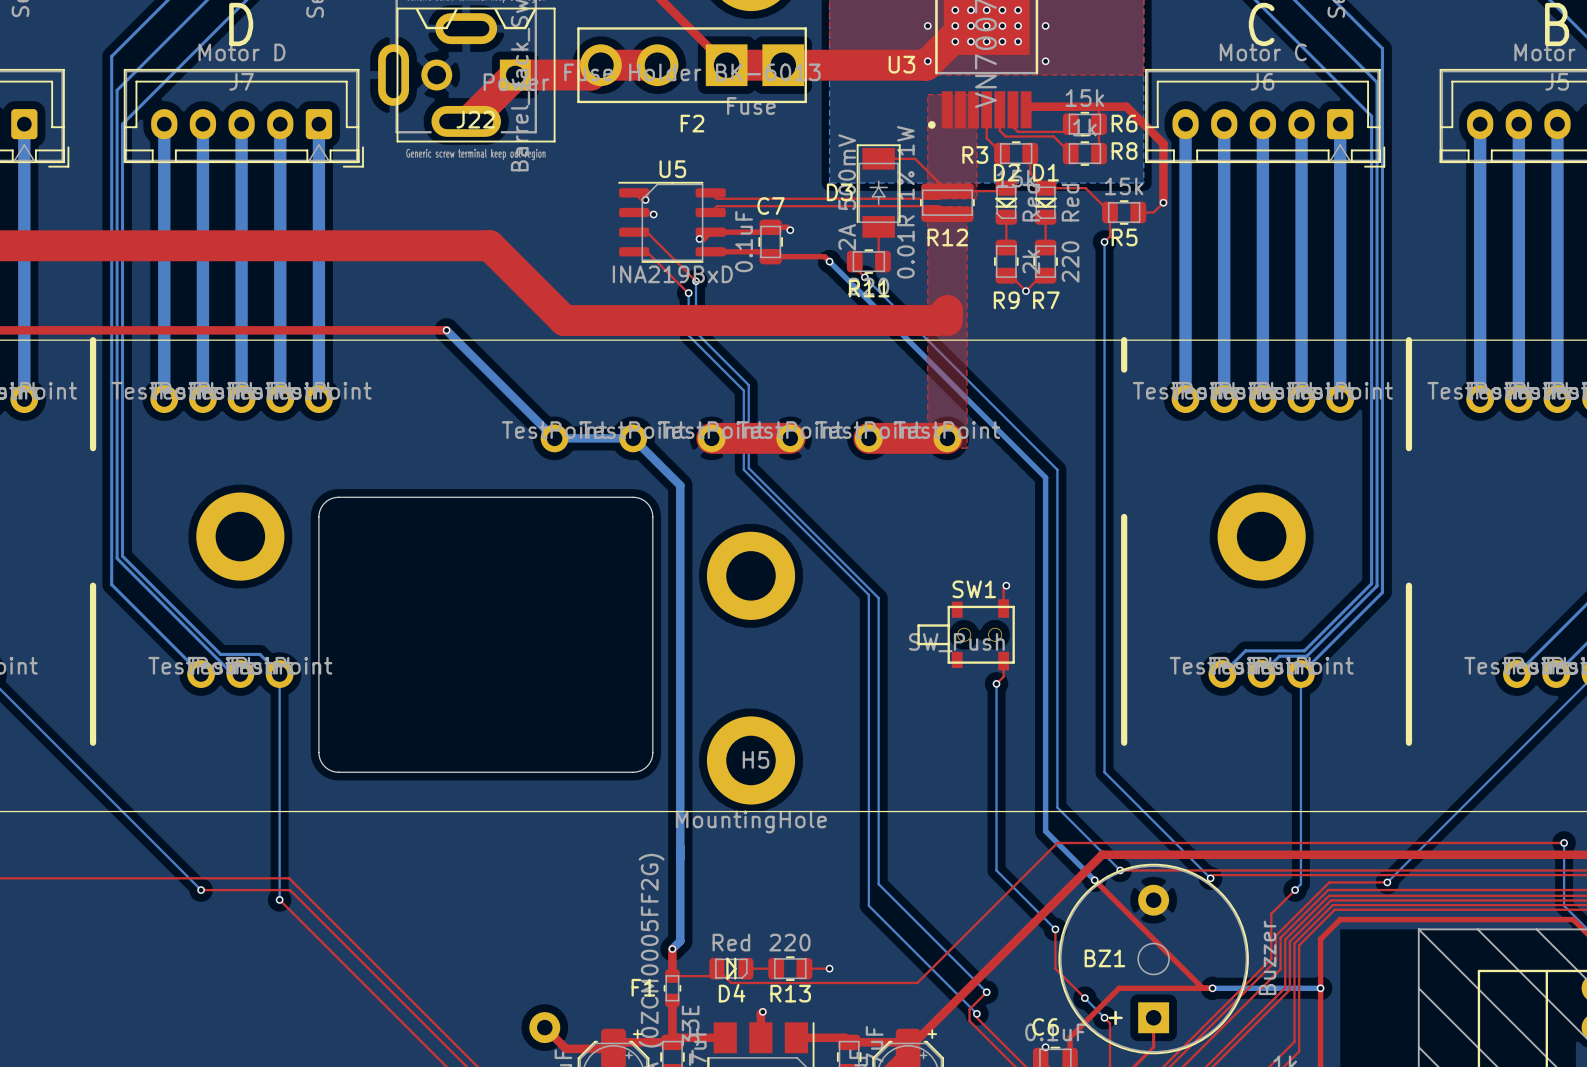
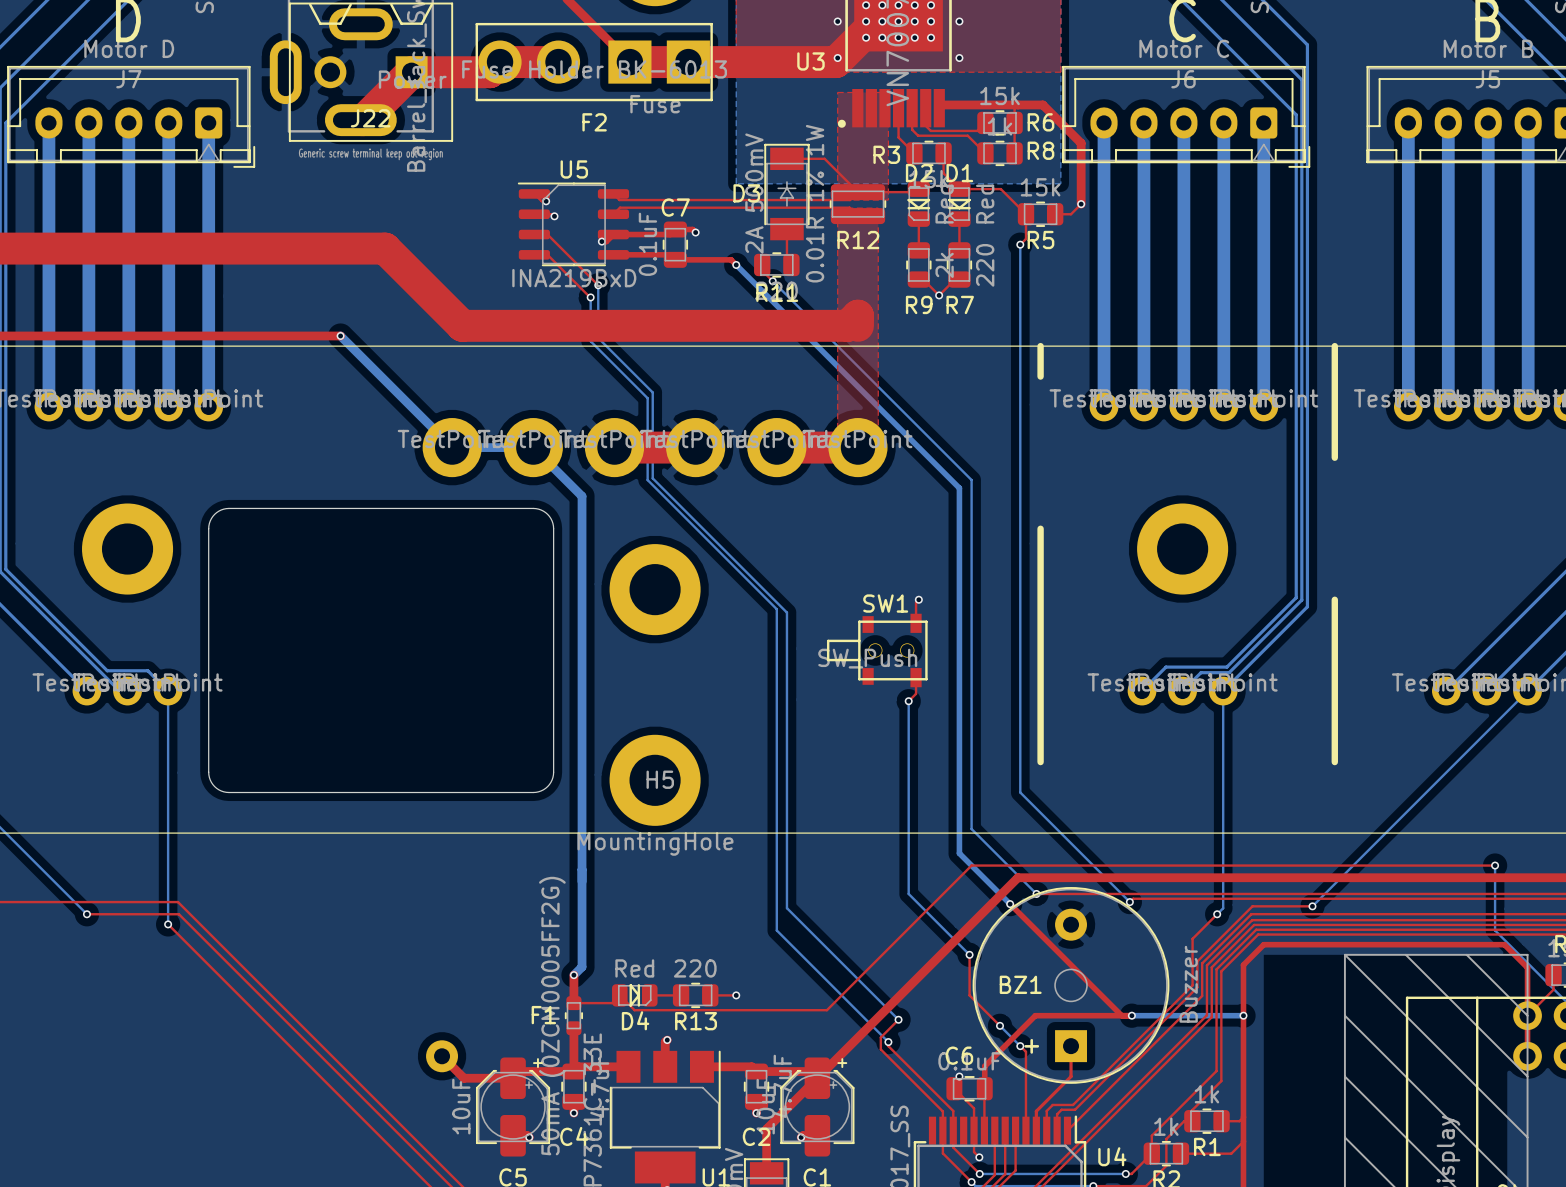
part footprint: [540, 424, 569, 453] -> [422, 418, 482, 478]
part footprint: [619, 424, 648, 453] -> [503, 418, 563, 478]
part footprint: [697, 424, 726, 453] -> [584, 418, 645, 478]
part footprint: [776, 424, 805, 453] -> [666, 418, 726, 478]
part footprint: [854, 424, 883, 453] -> [747, 418, 807, 478]
part footprint: [933, 424, 962, 453] -> [828, 418, 888, 478]

